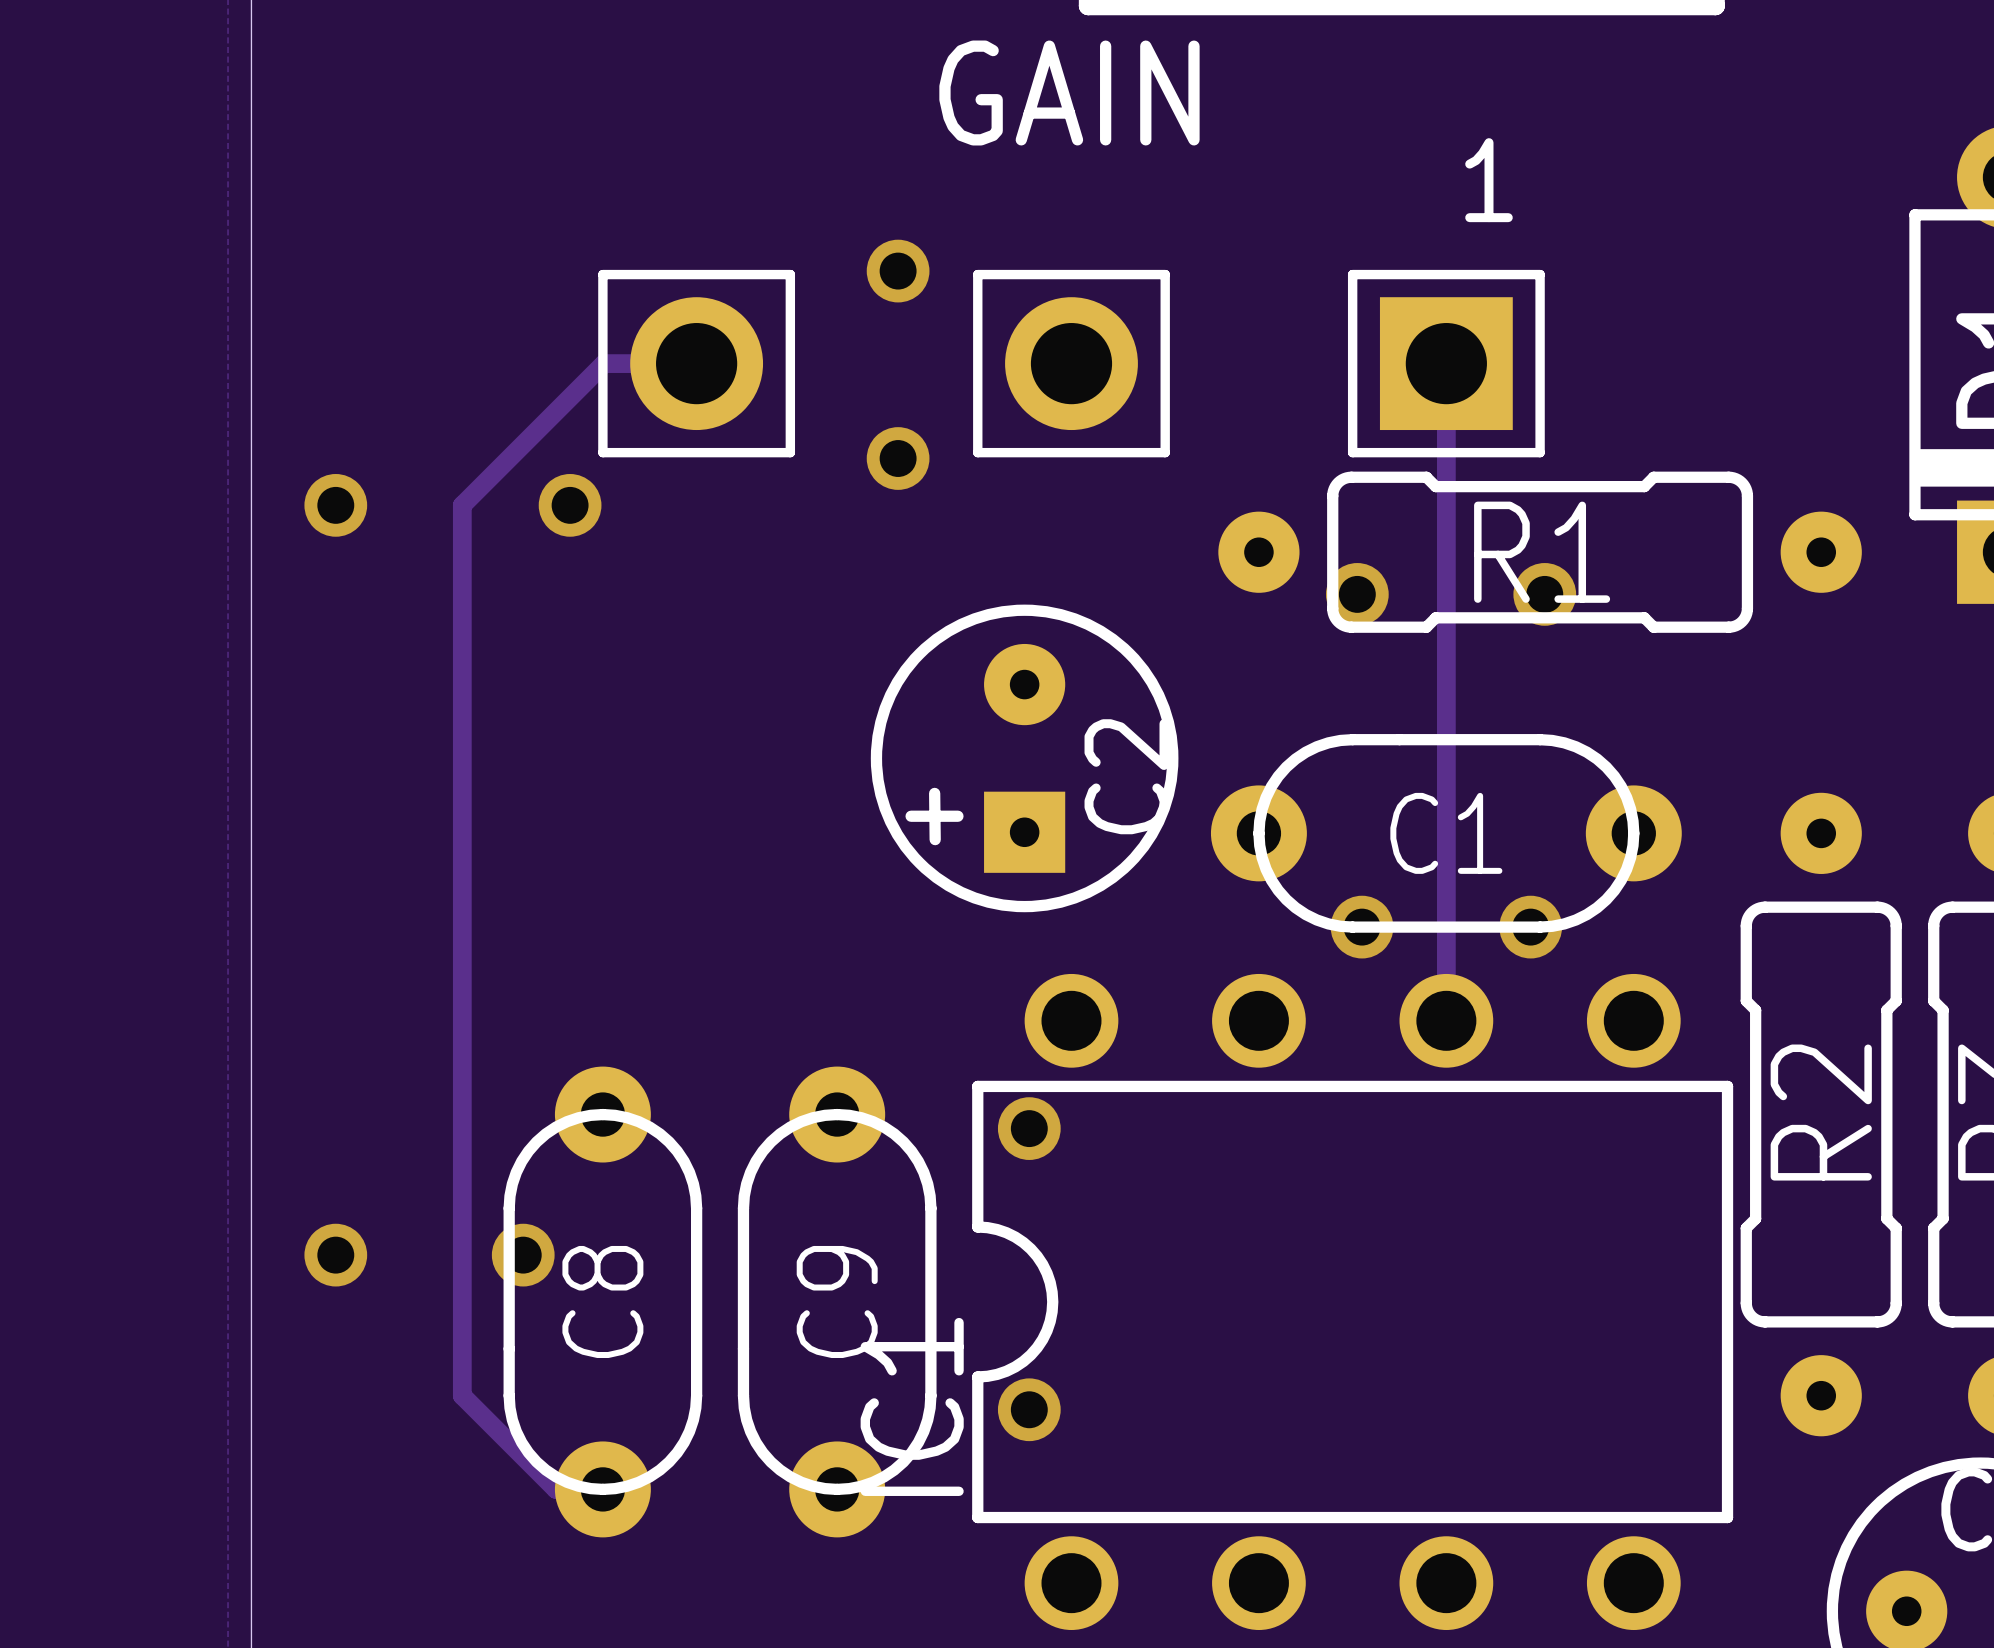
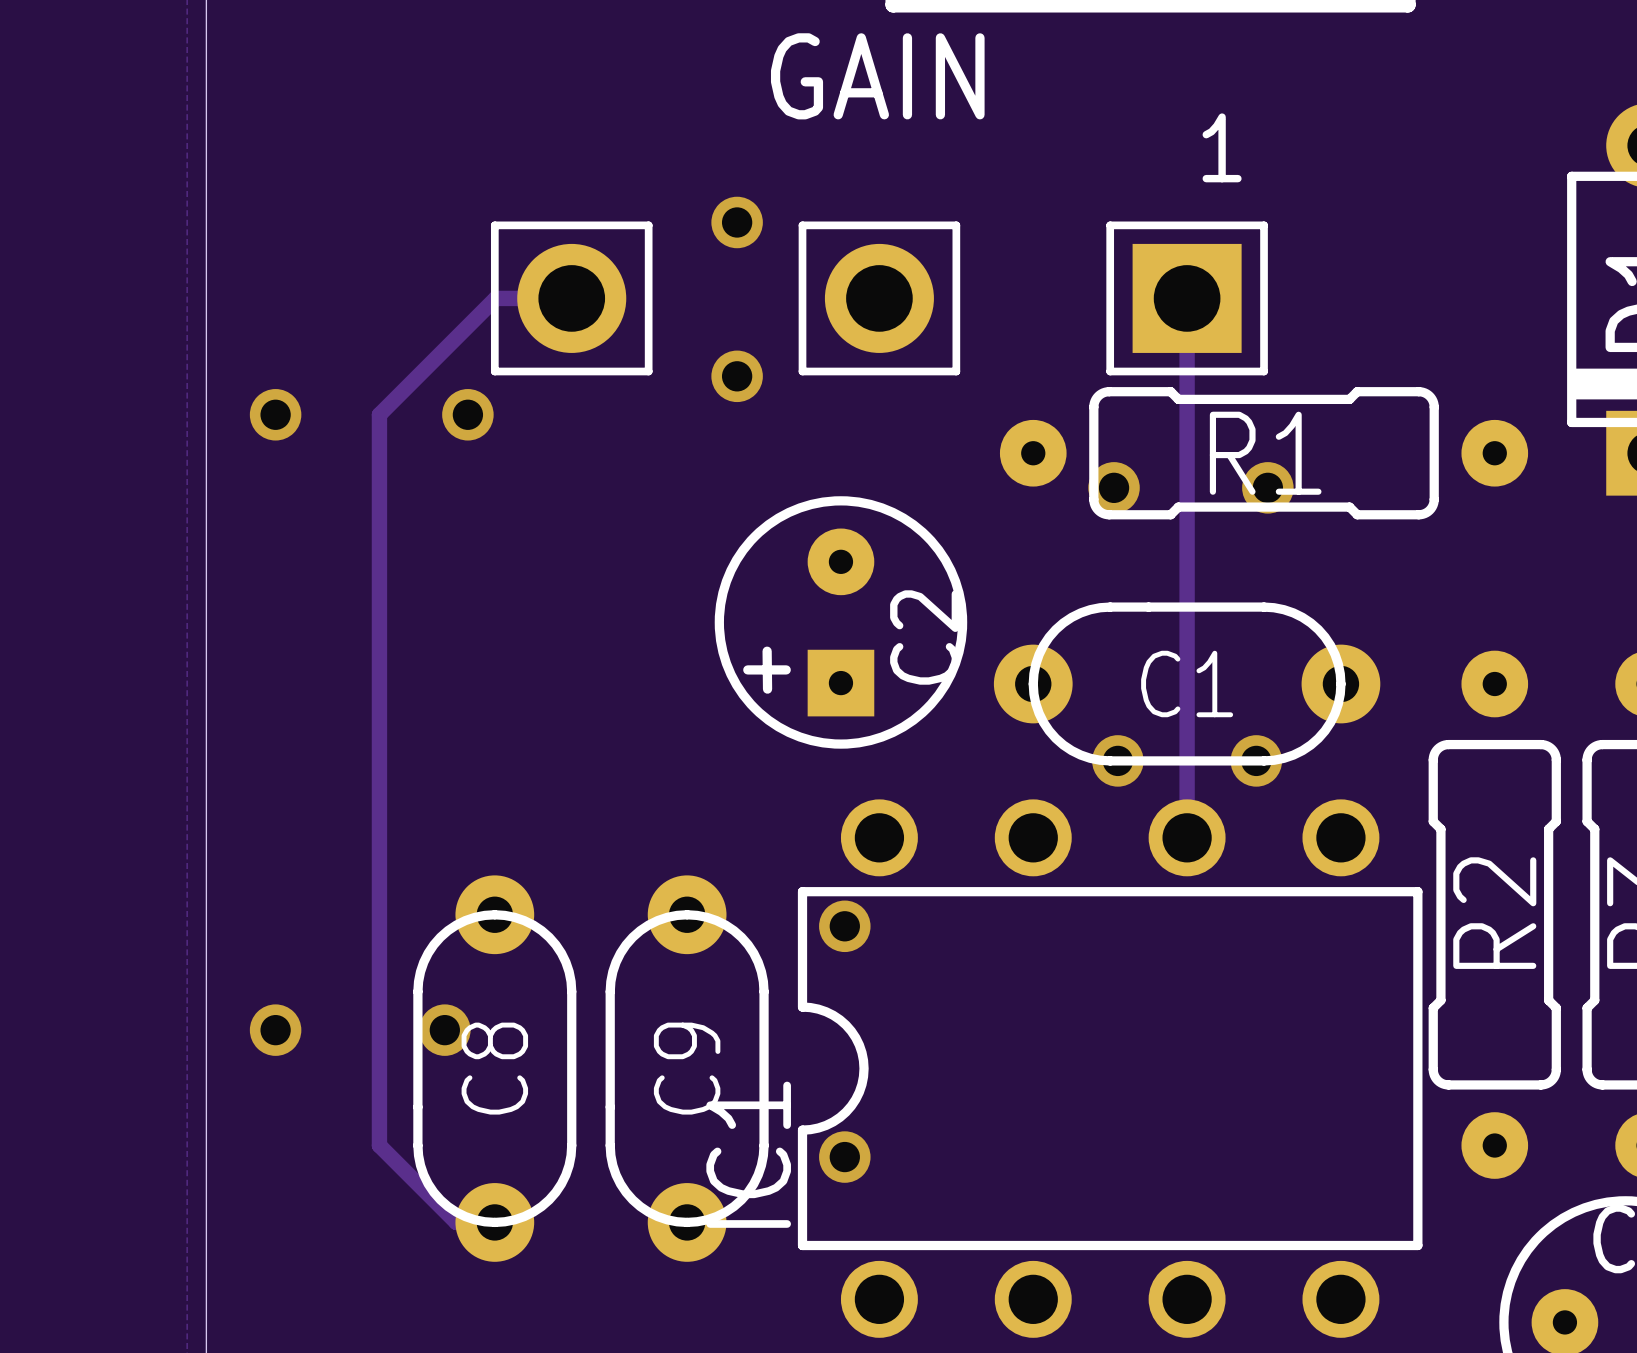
via position: (523, 1255) -> (444, 1030)

